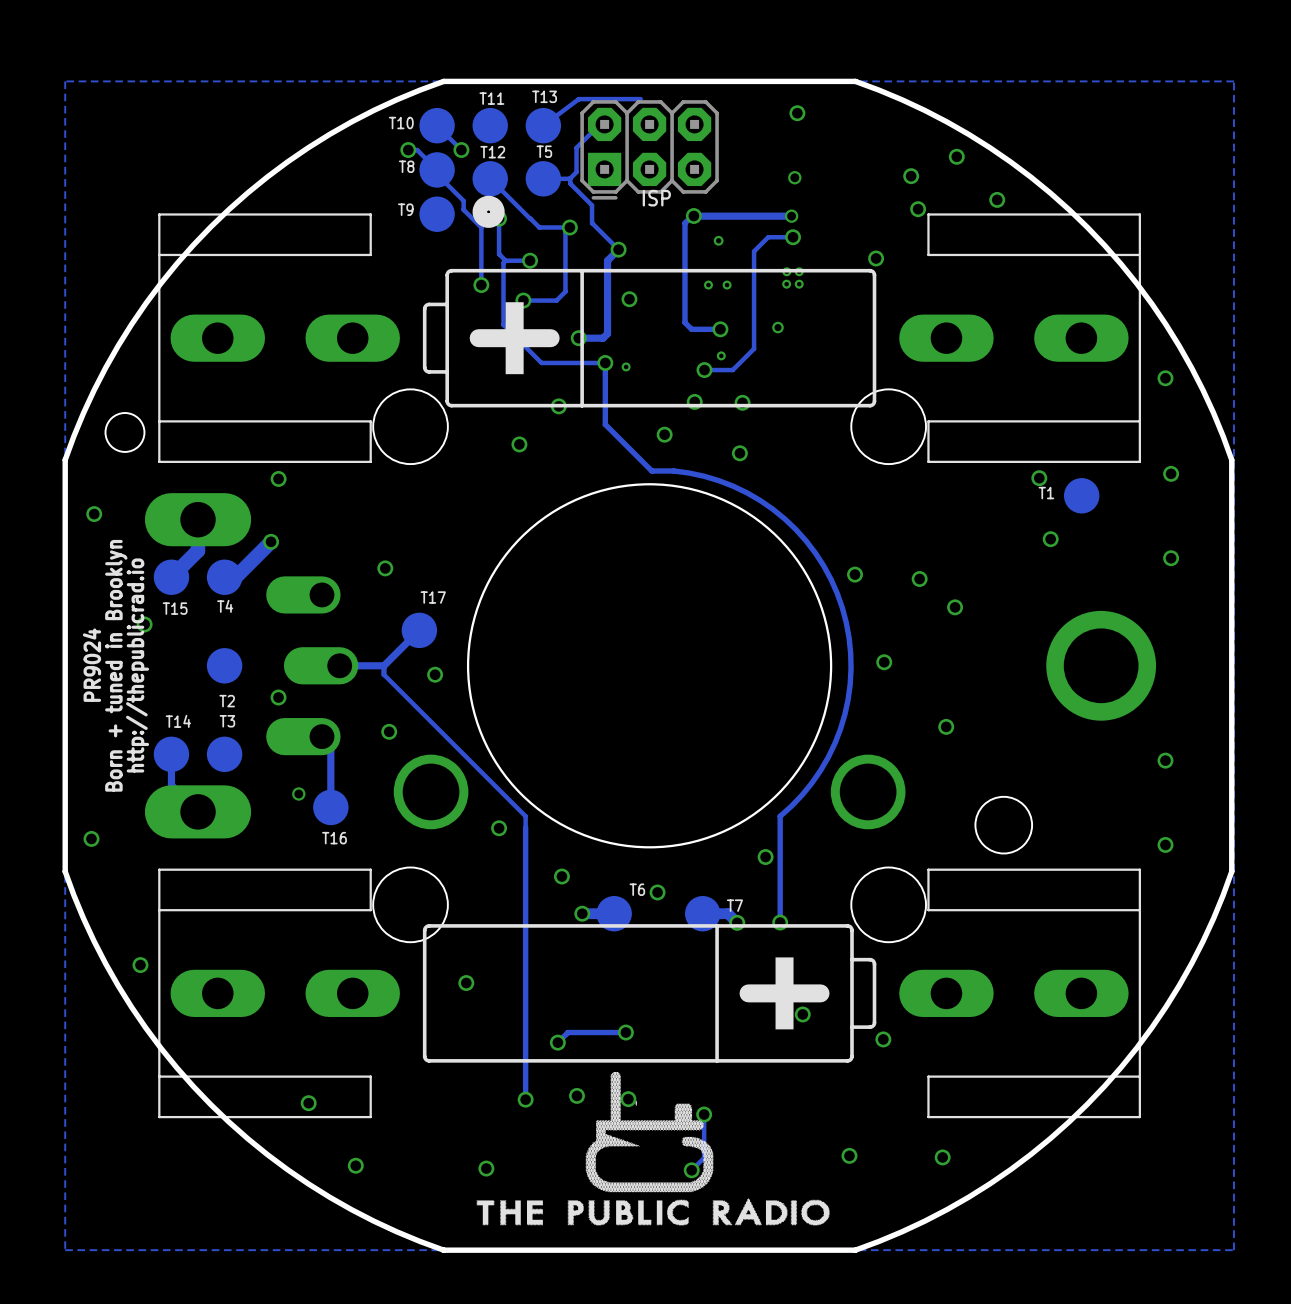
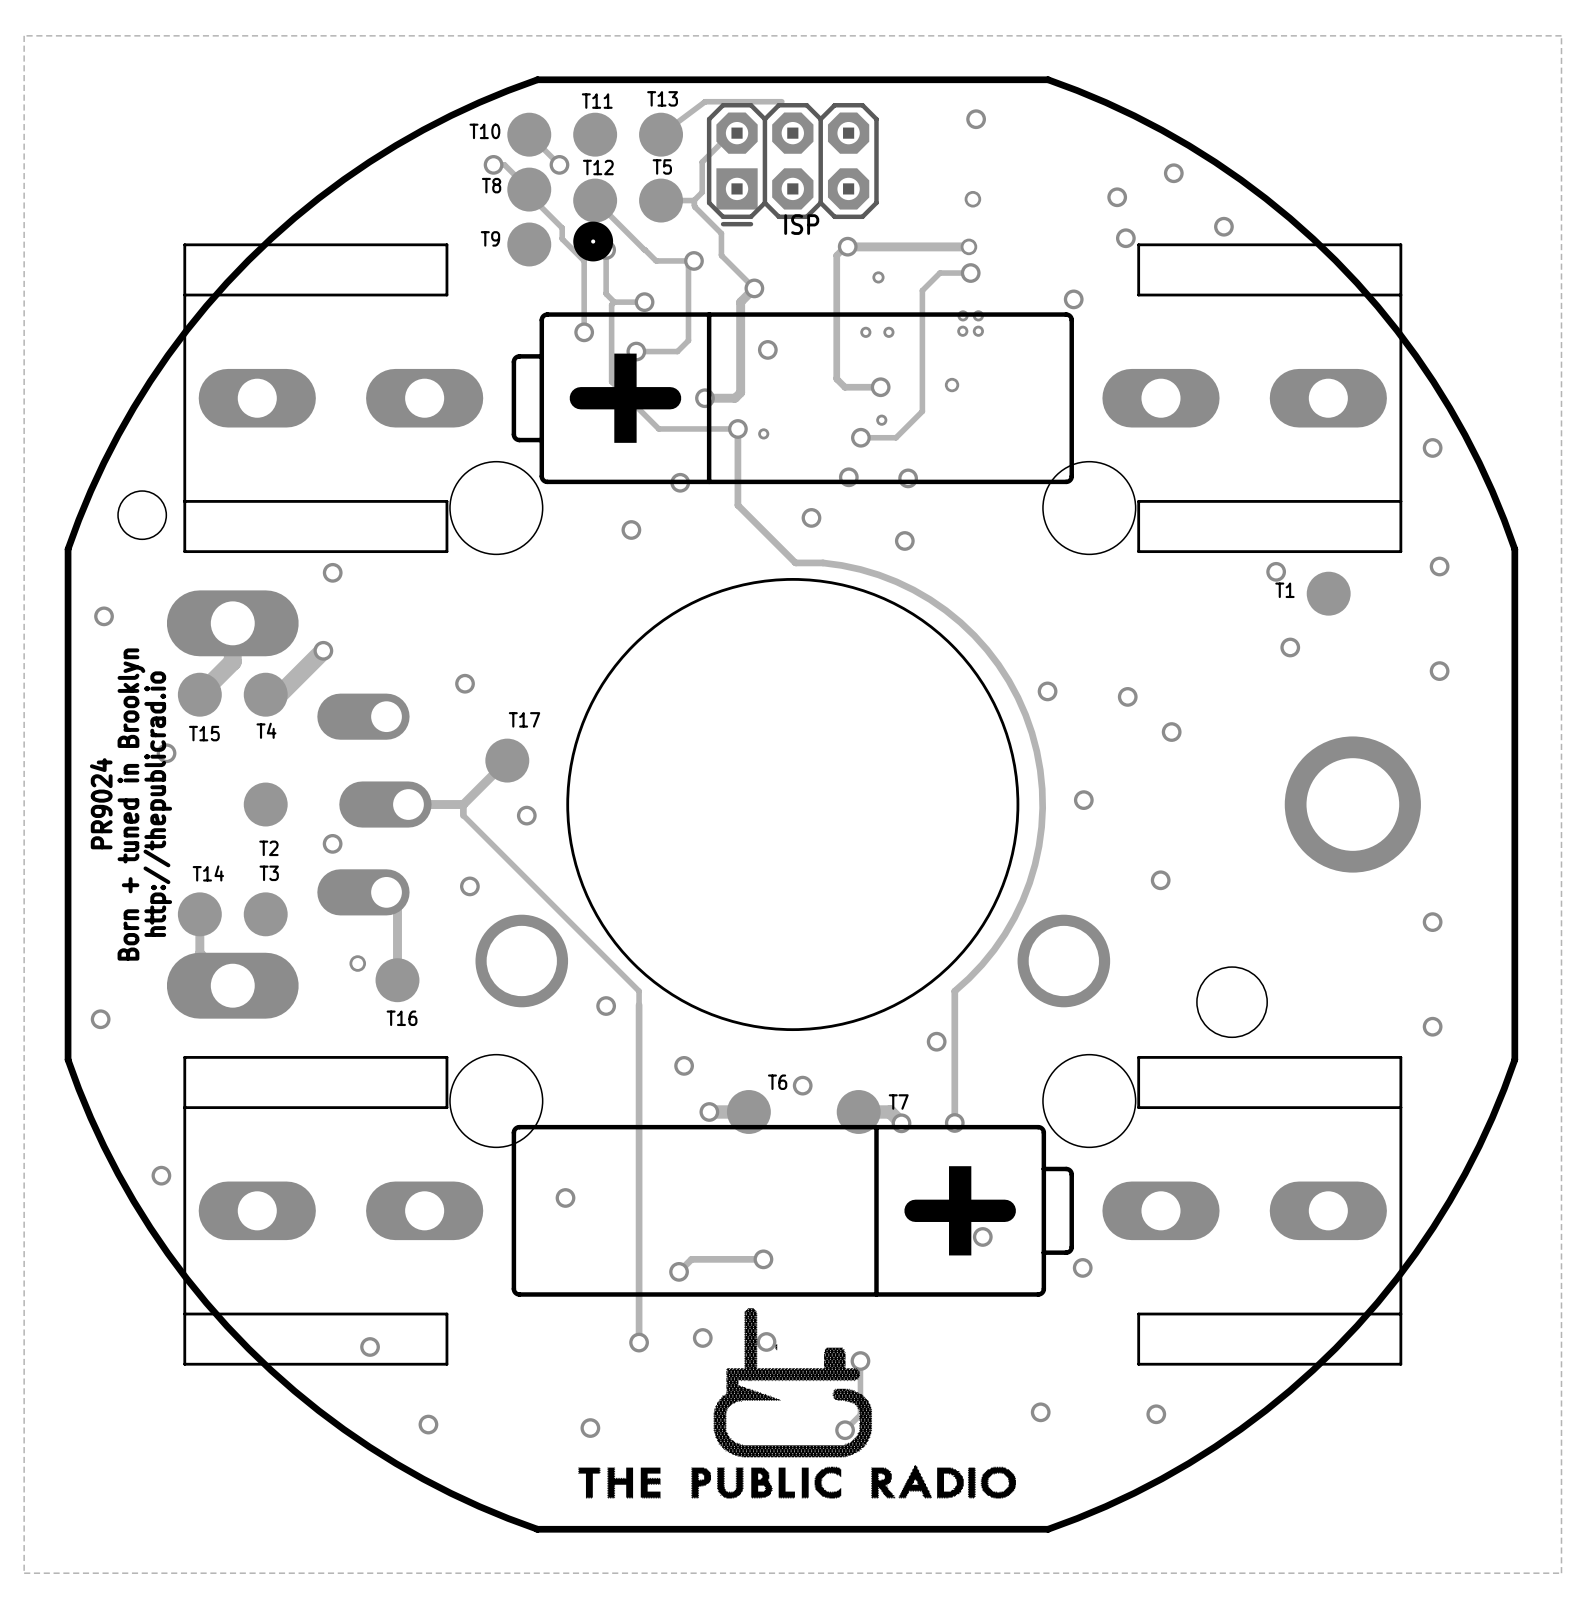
zone outline: (1233, 81) (65, 81) (65, 1250) (1233, 1250) (1233, 81) -> (1561, 35) (1561, 1573) (24, 1573) (24, 35) (1561, 35)

